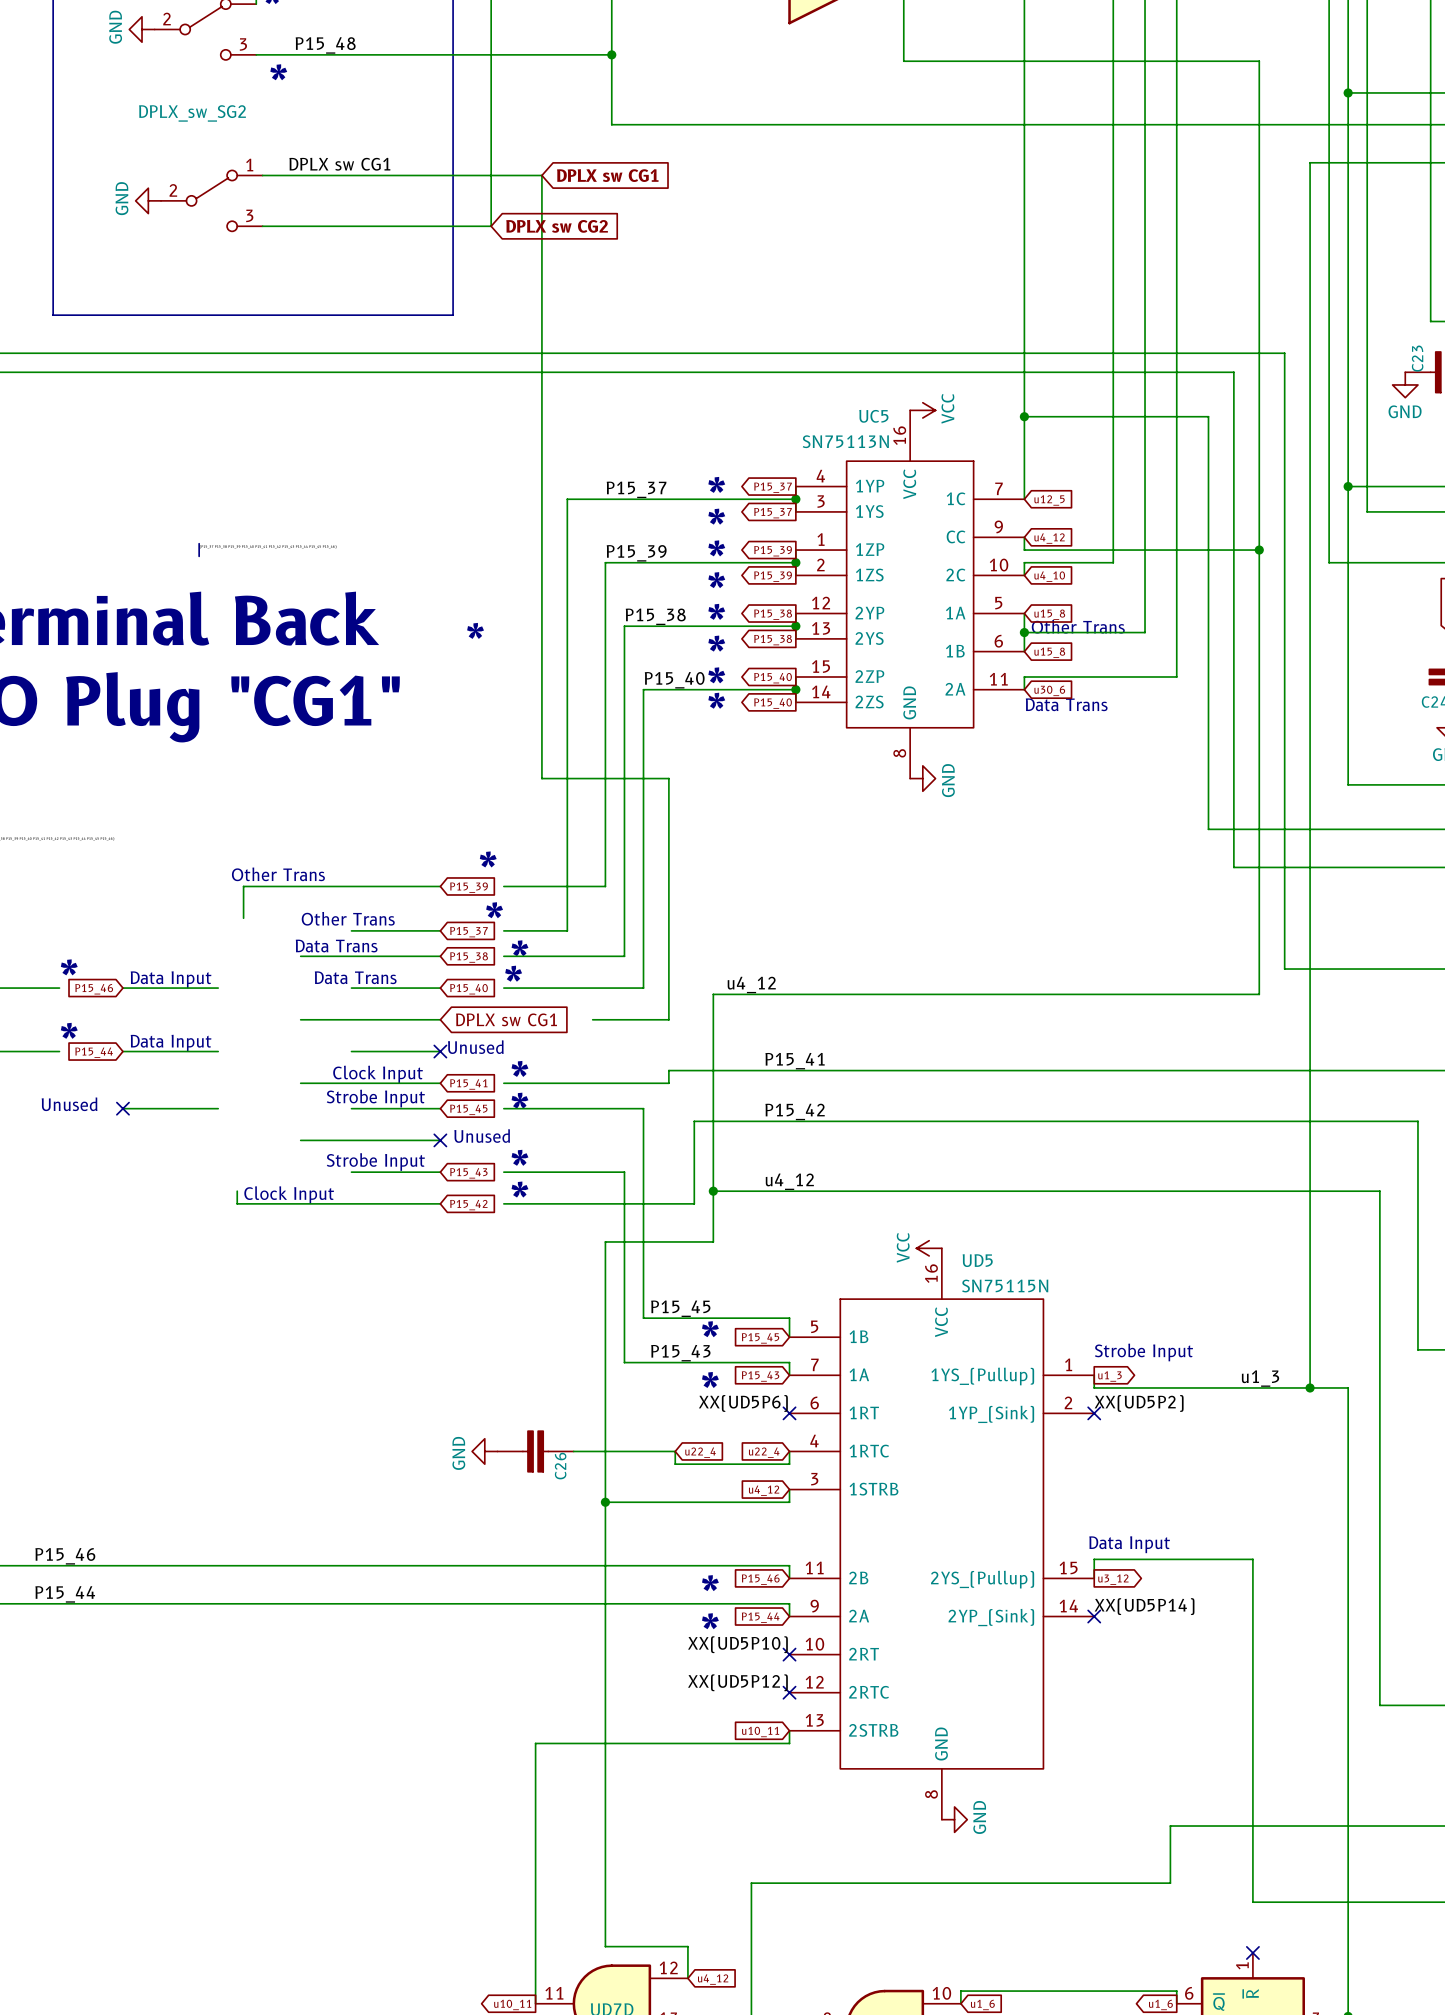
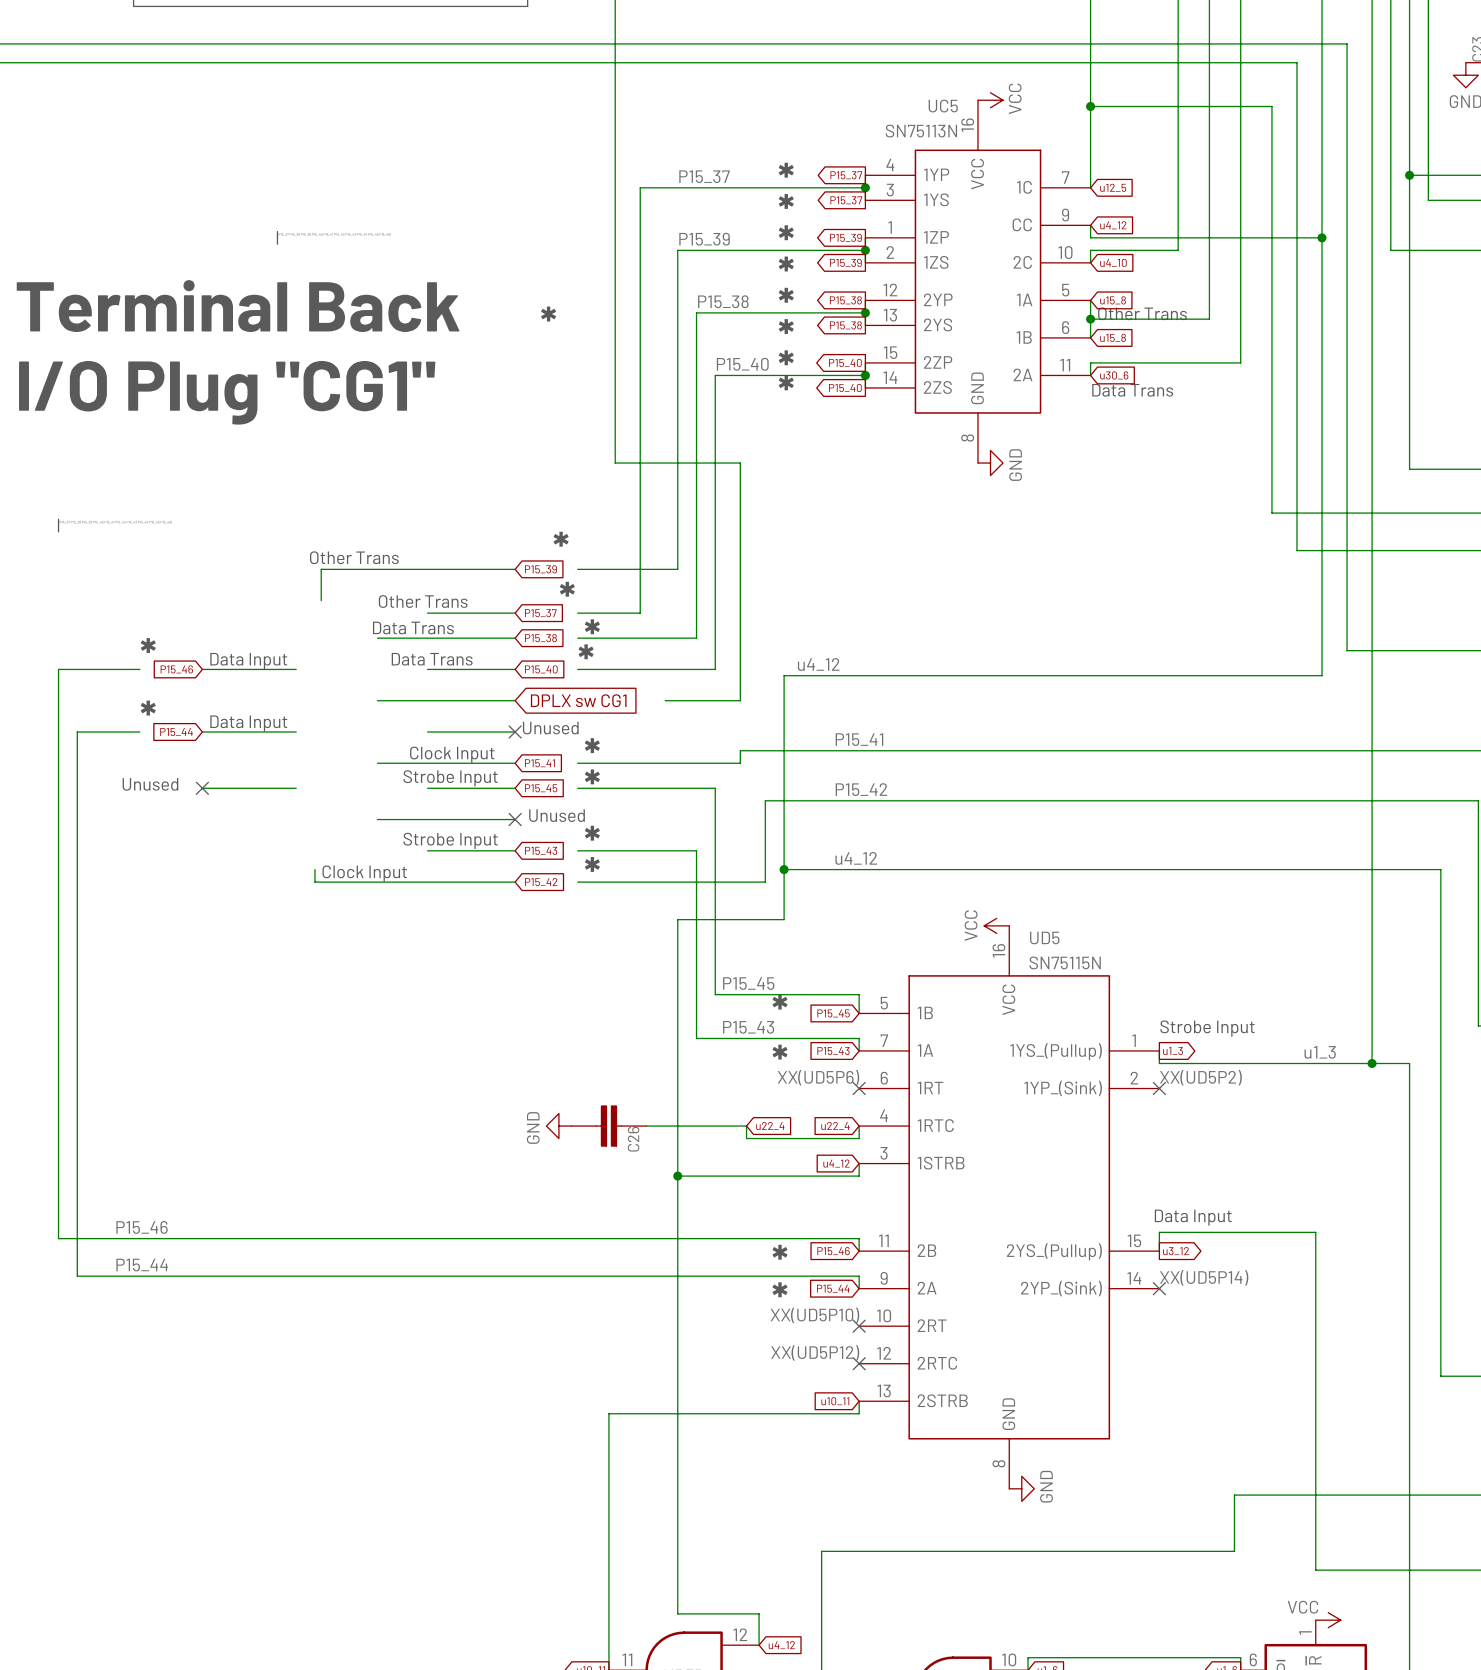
no-connect mark: (1252, 1952) -> none
power symbol: none -> VCC (1328, 1620)

